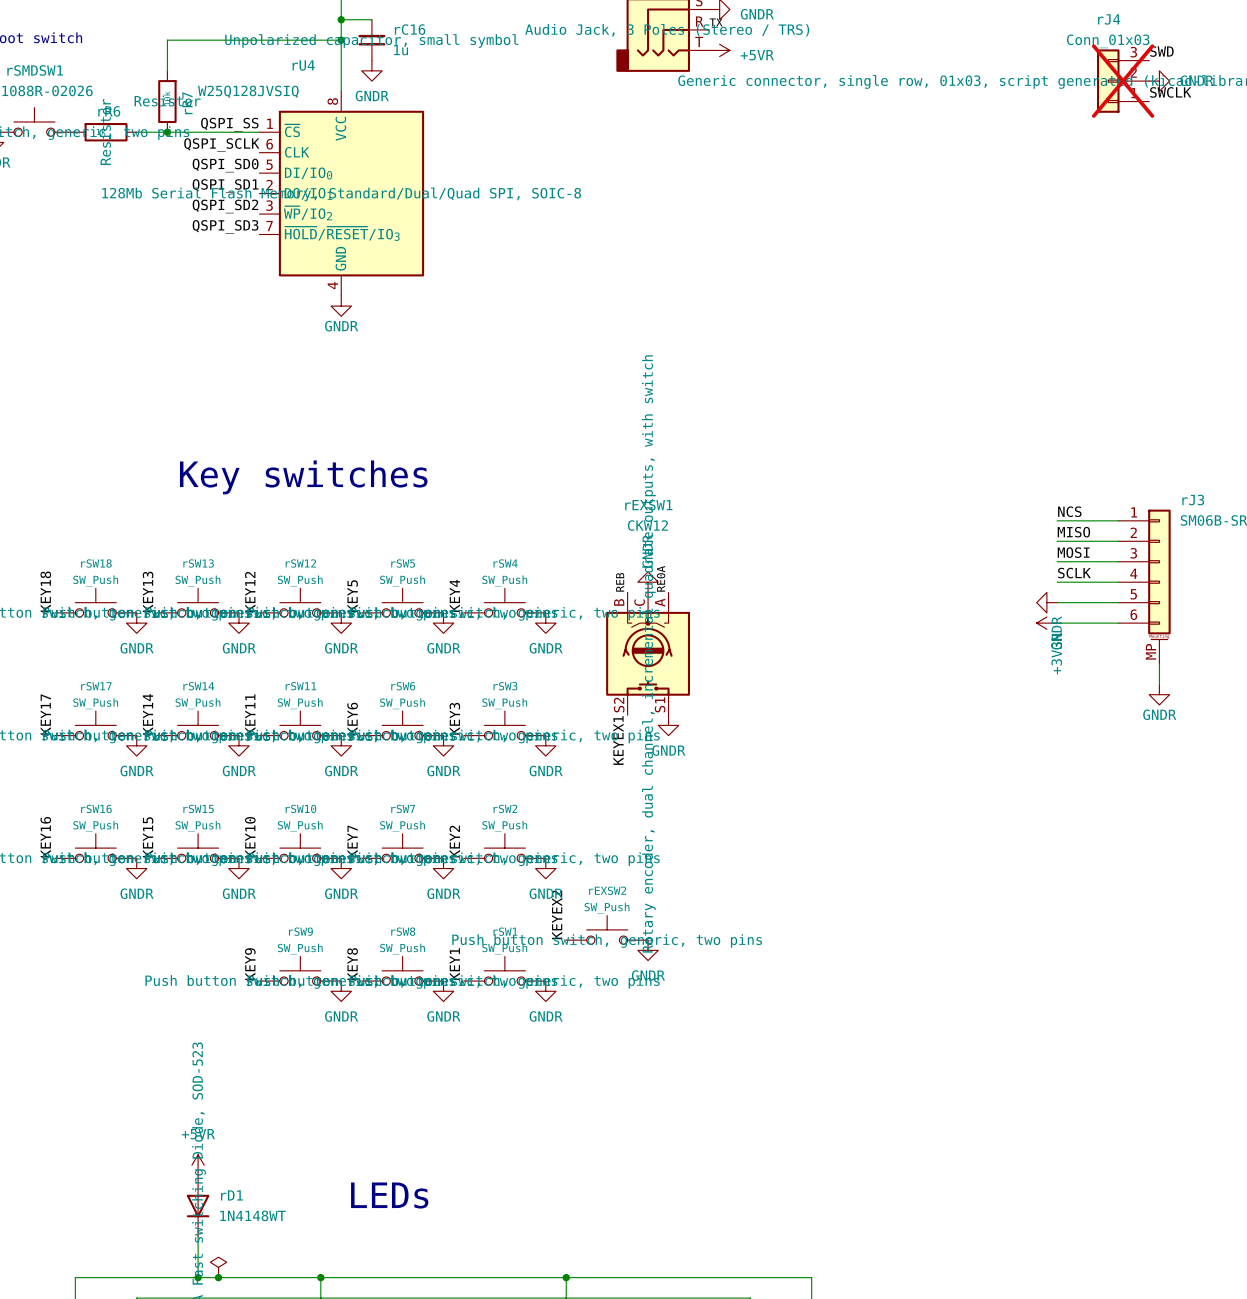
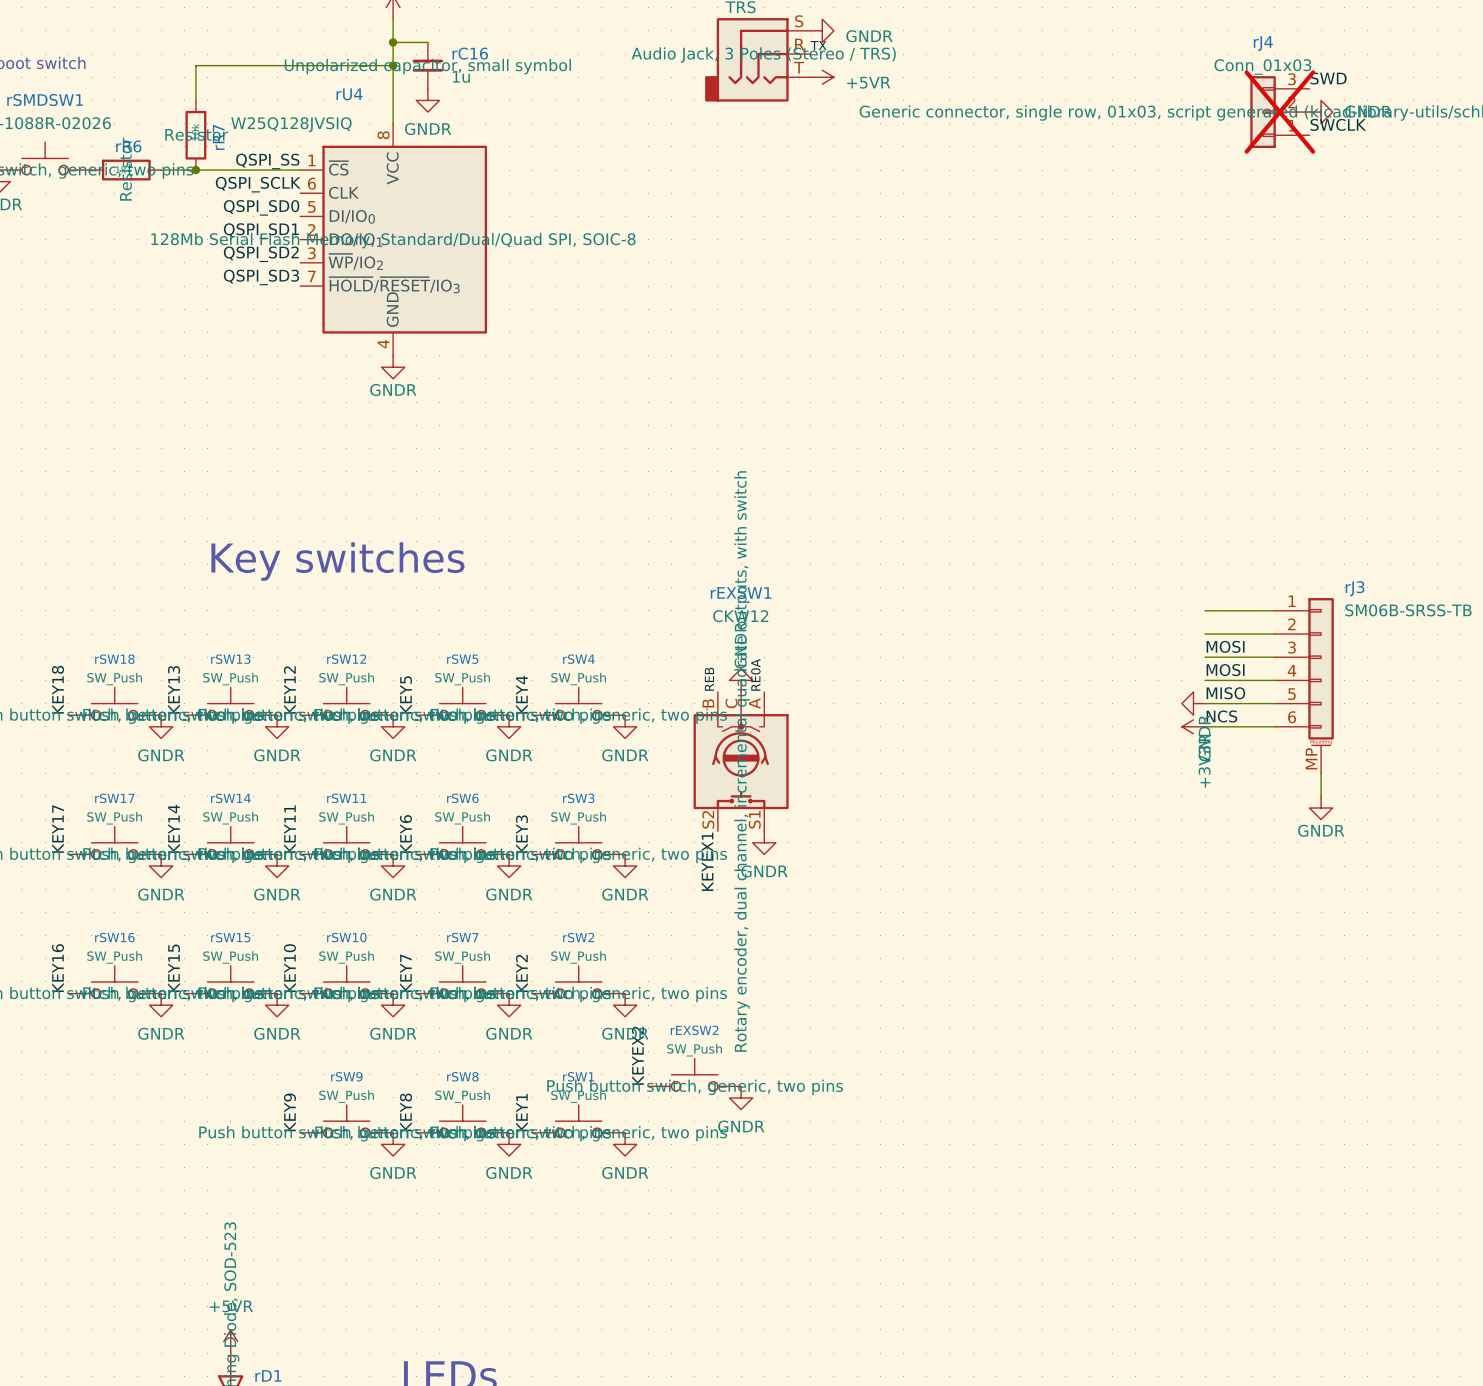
label position: NCS (1069, 511) -> NCS (1221, 716)
label position: MISO (1073, 532) -> MISO (1225, 693)
label: SCLK (1074, 573) -> MOSI (1225, 670)

